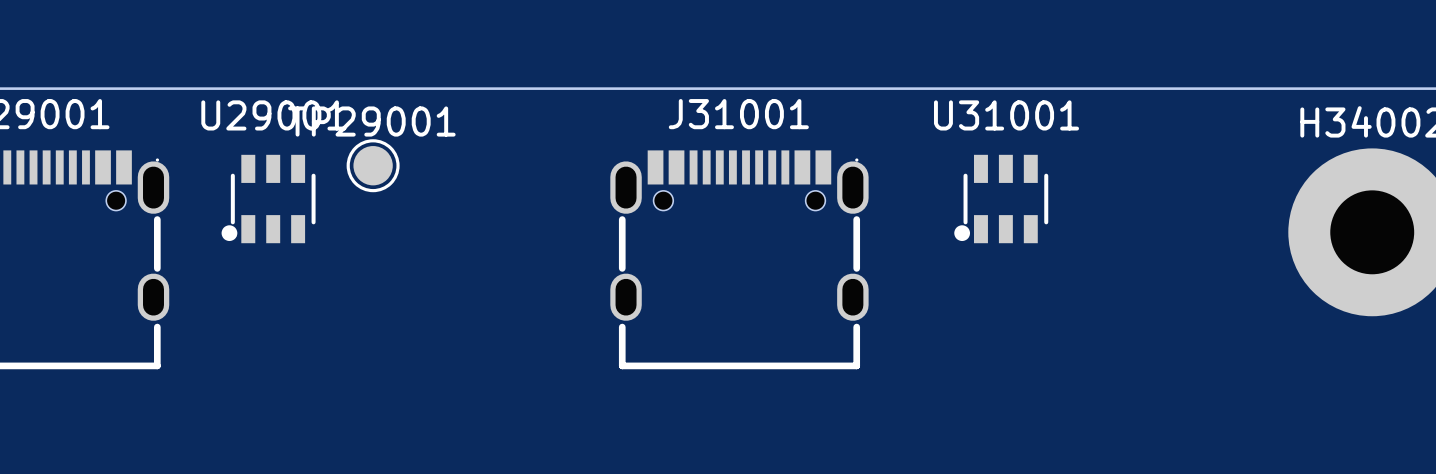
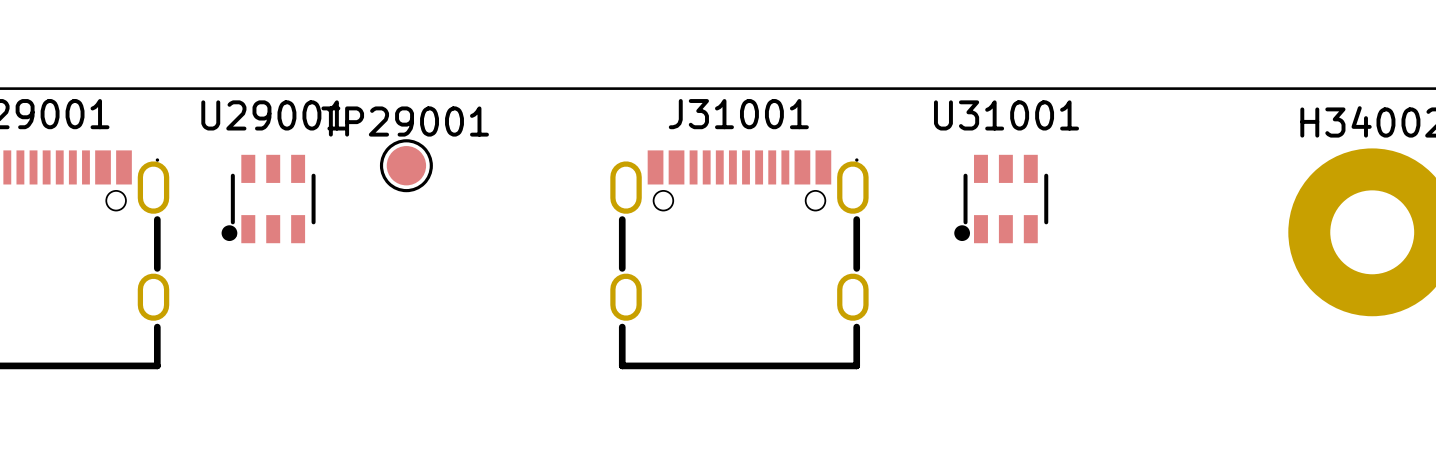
TP29001 position: (373, 165) -> (406, 165)

